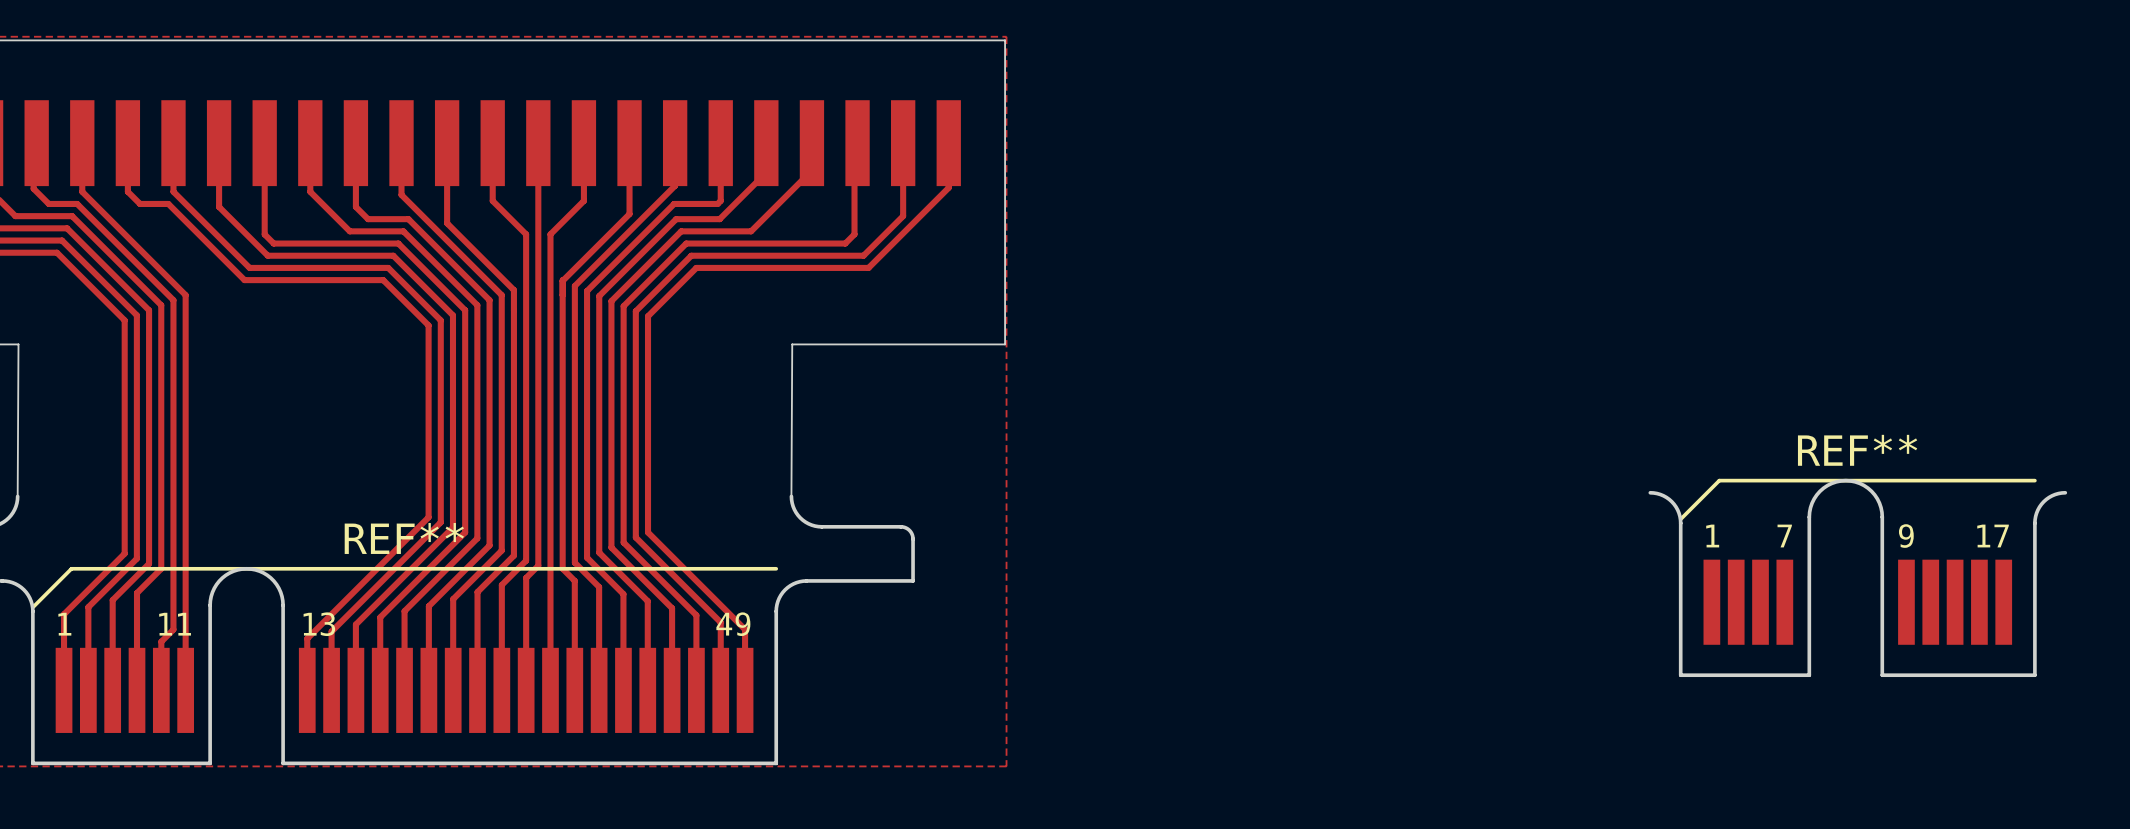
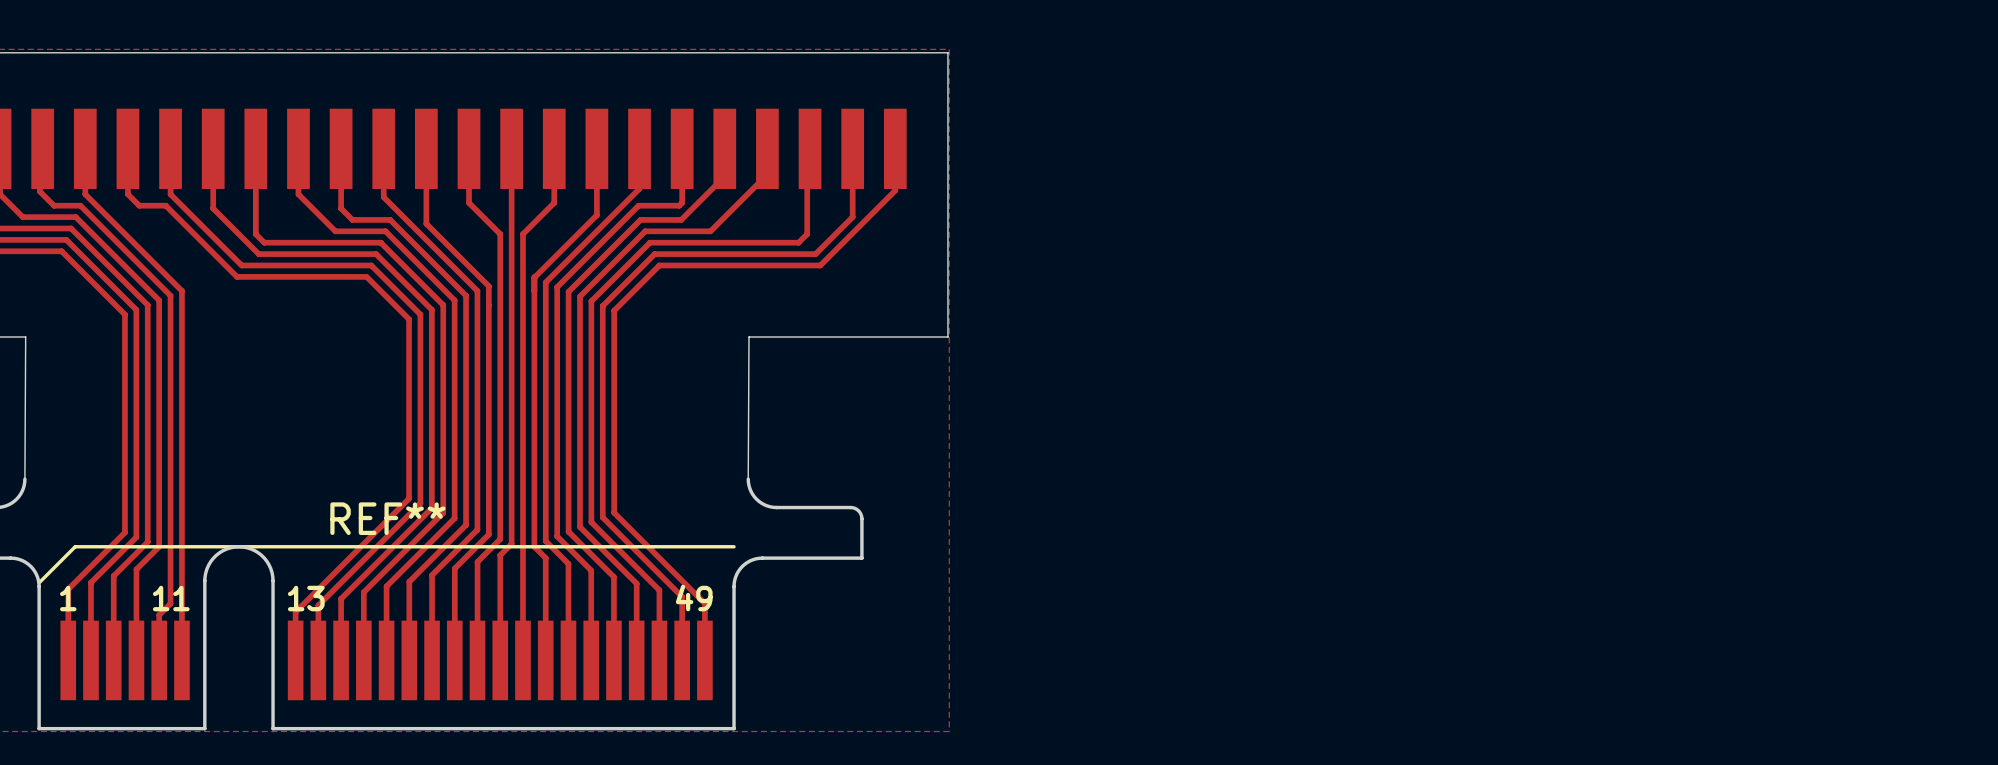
REF**: (1857, 577) -> none

